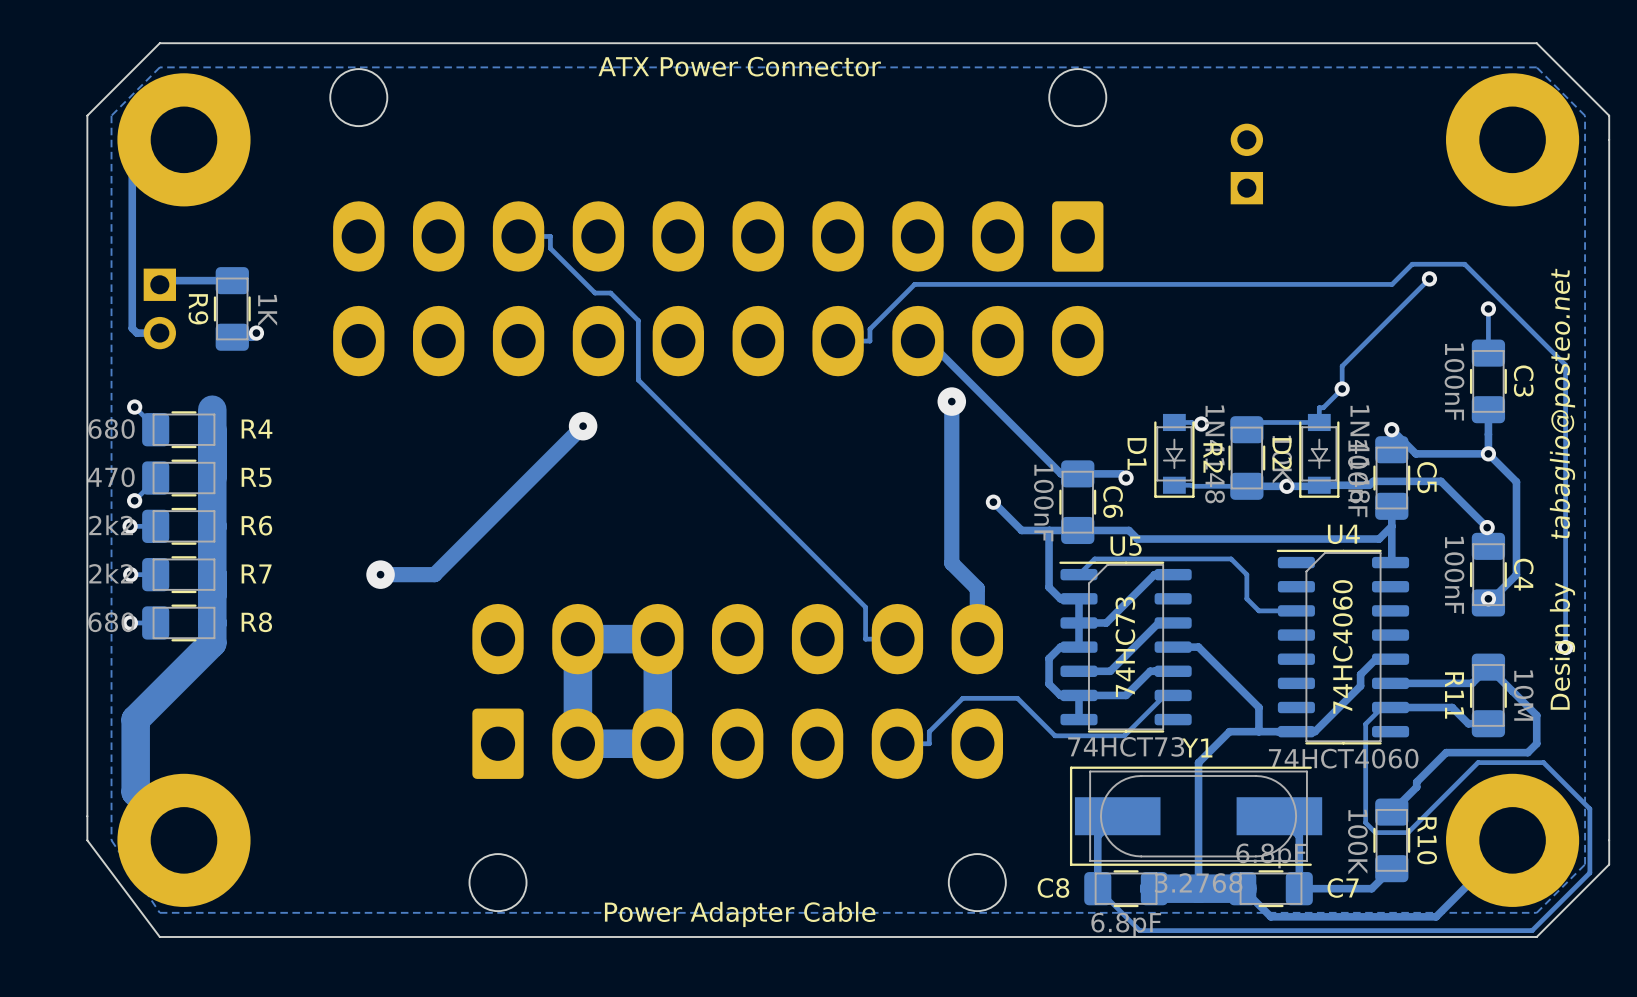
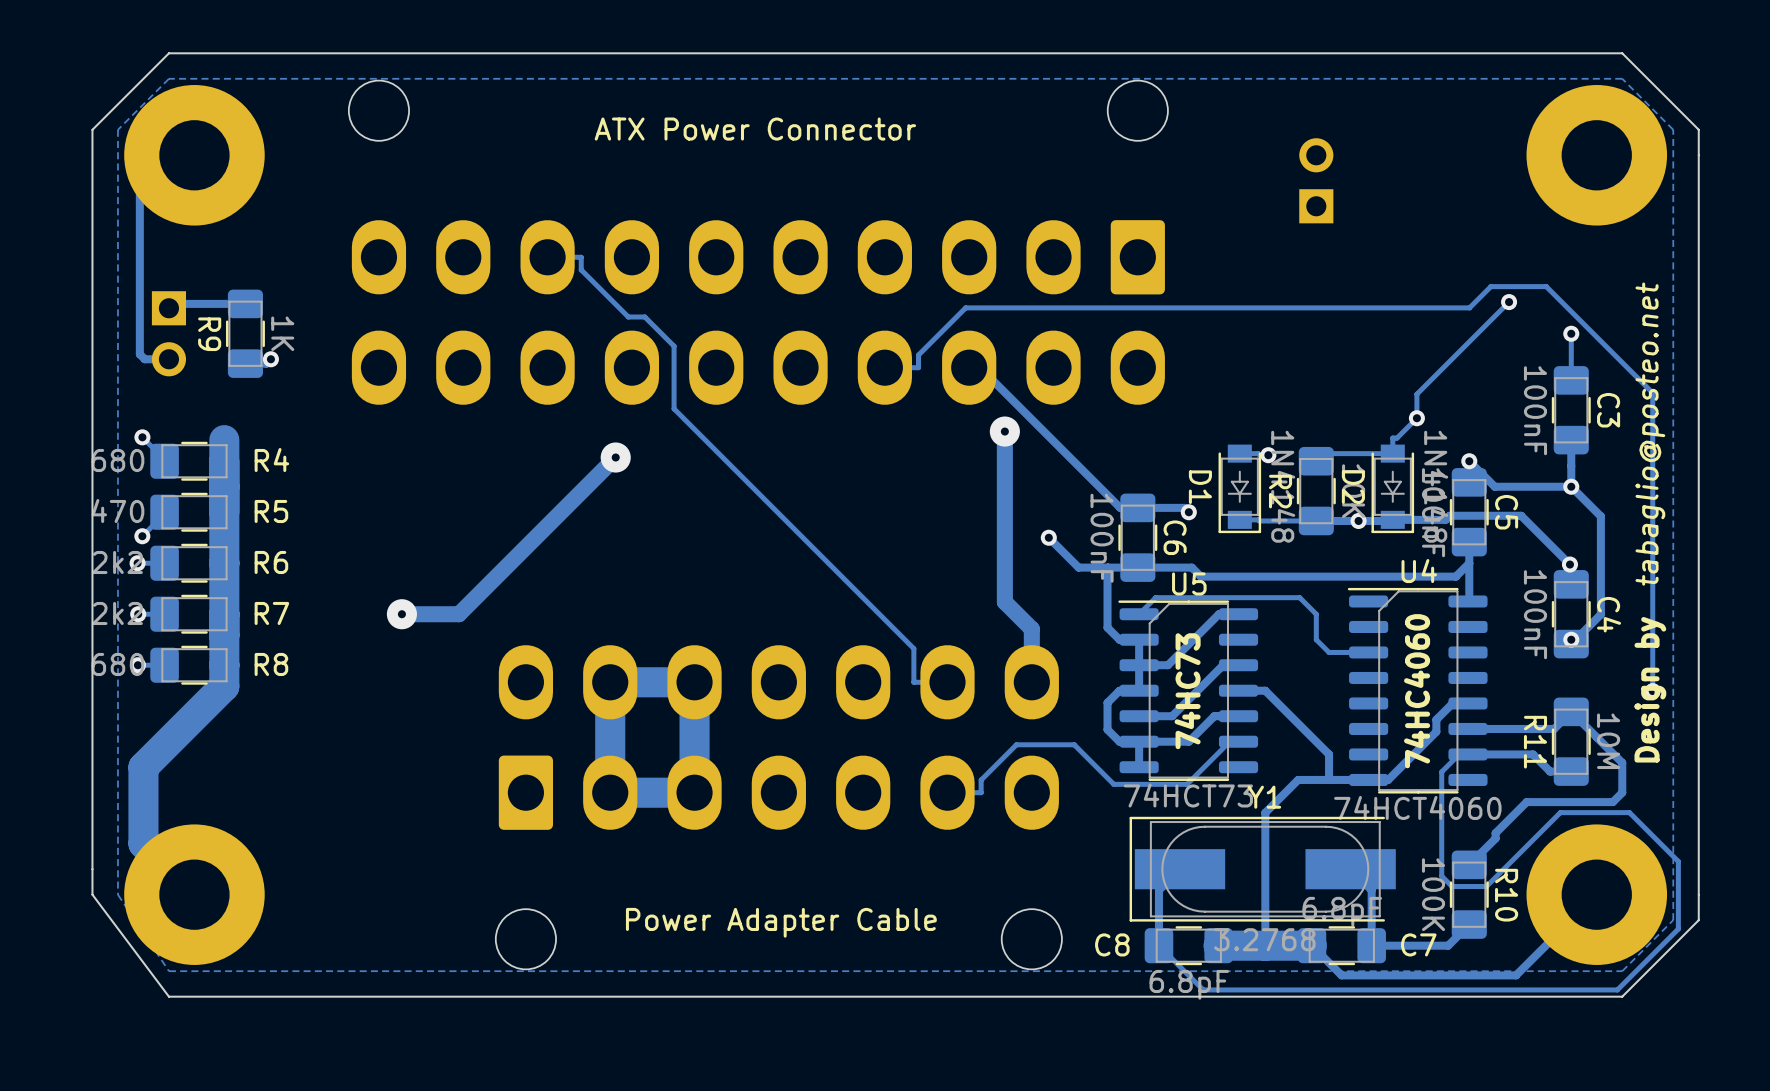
text position: ATX Power Connector (739, 66) -> ATX Power Connector (755, 129)
text position: Power Adapter Cable (740, 914) -> Power Adapter Cable (781, 922)

